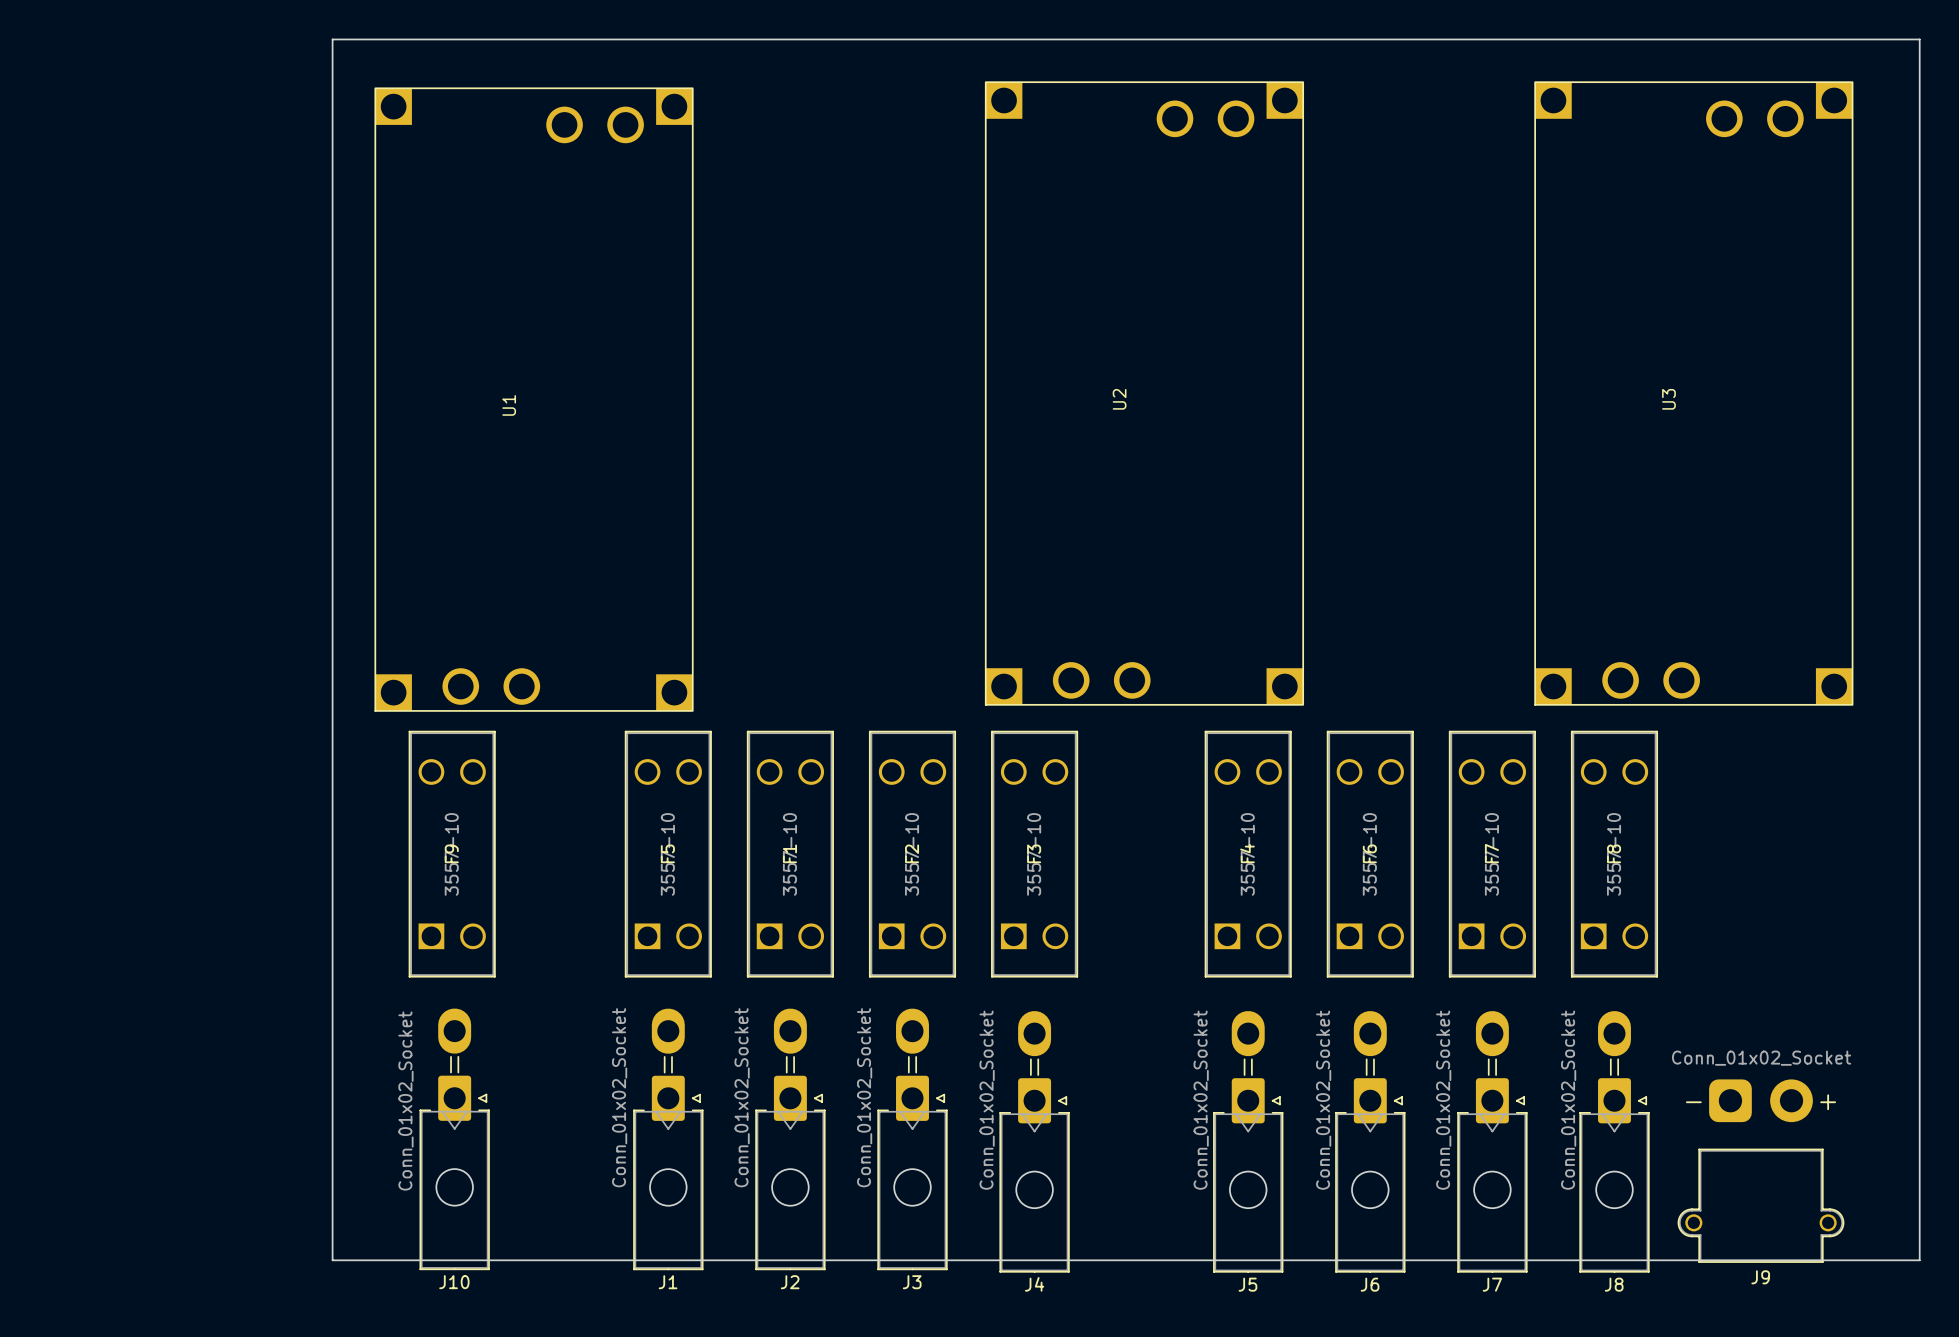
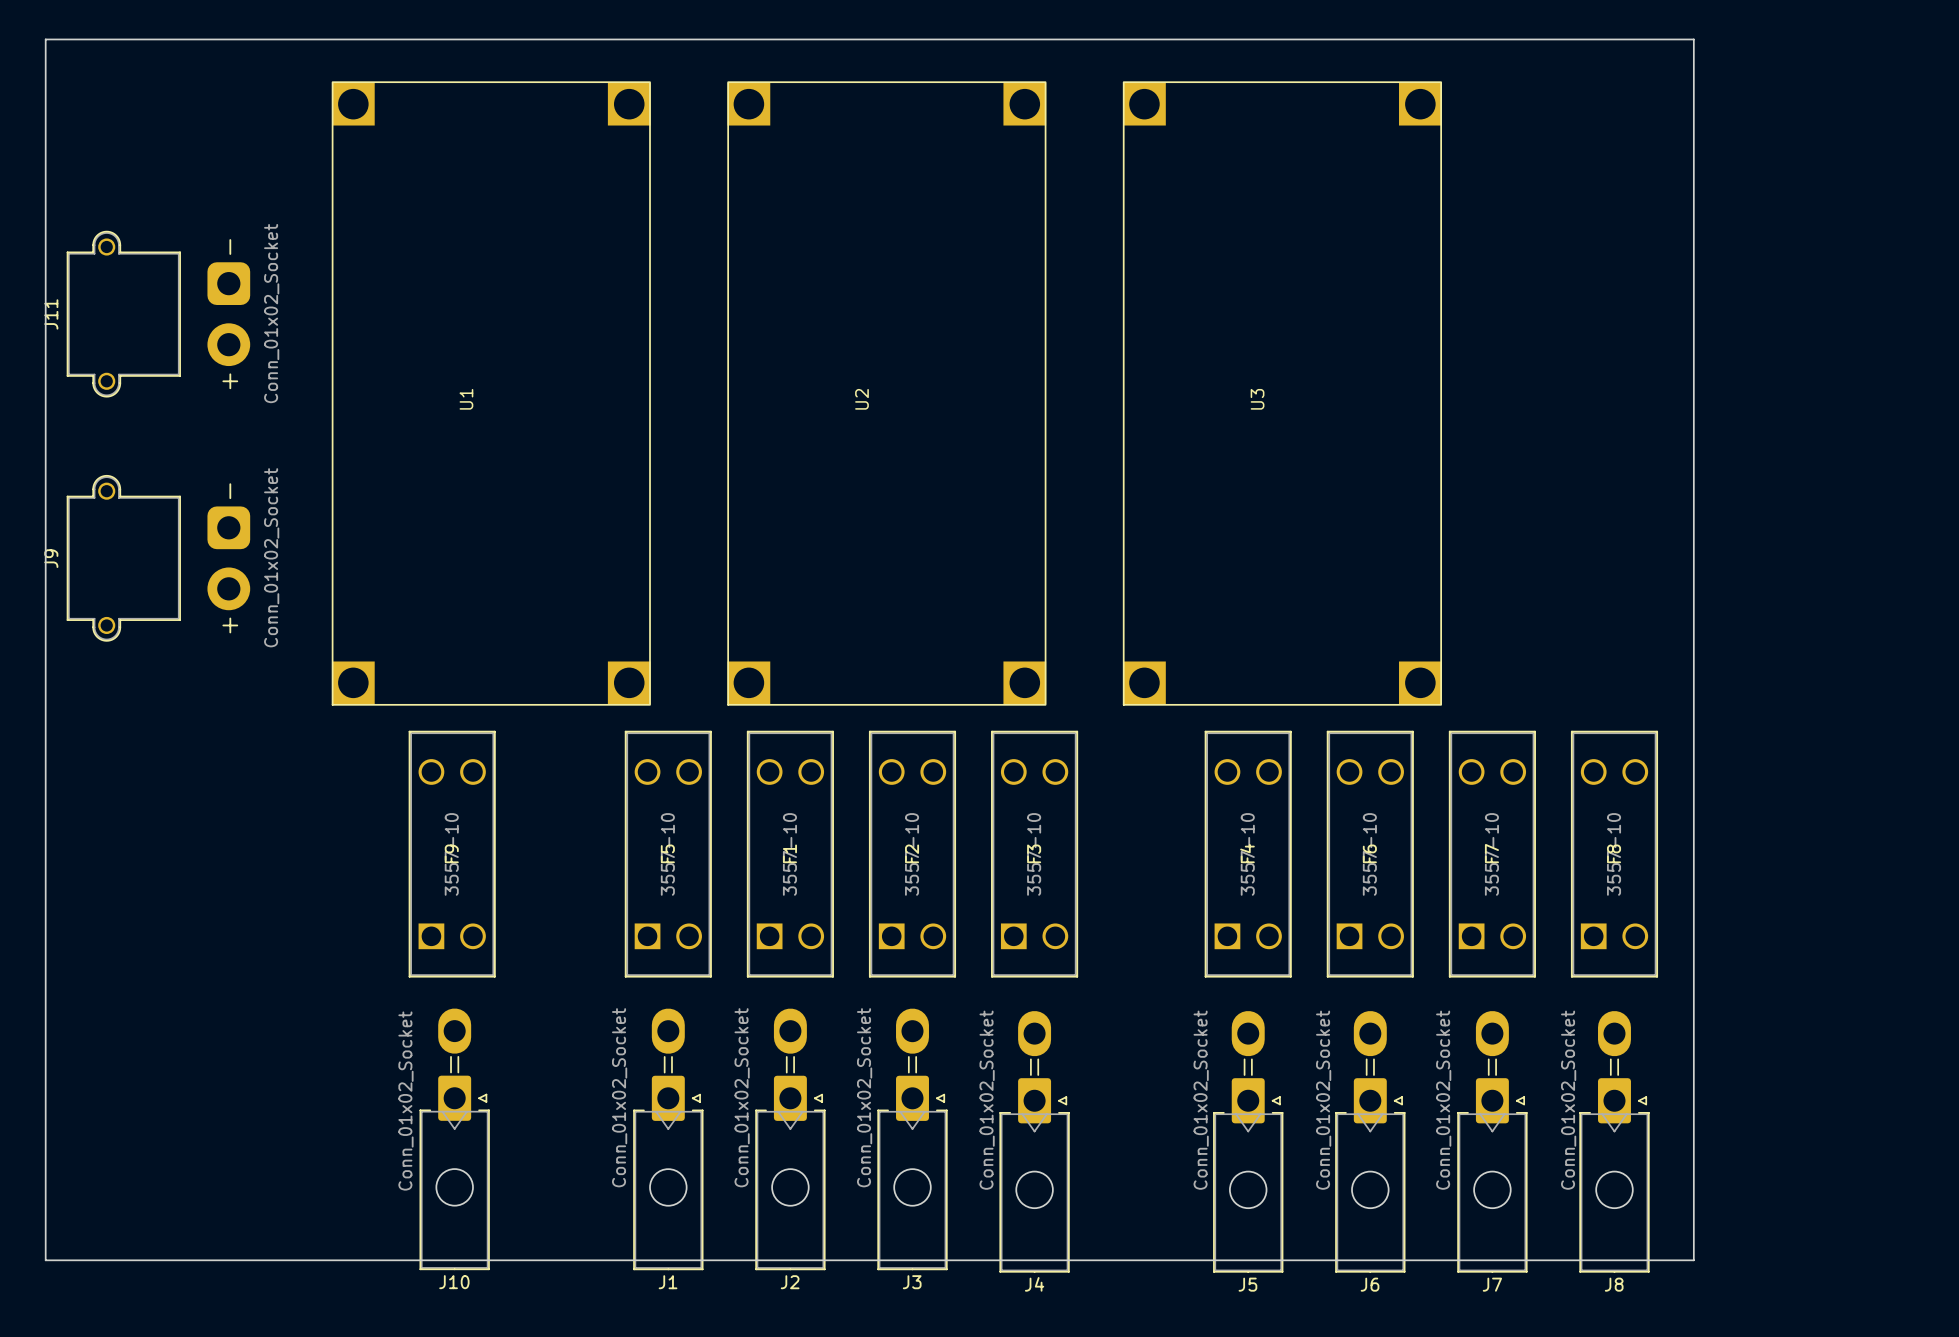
board edge: (332, 39) (332, 1260) -> (332, 39) (45, 39) (45, 1260) (332, 1260)
board edge: (1693, 39) (1919, 39) (1919, 1260) (1693, 1260) -> (1693, 39) (1693, 1260)
U2 footprint: [985, 81, 1304, 706] -> [727, 81, 1047, 706]
U3 footprint: [1534, 81, 1854, 706] -> [1123, 81, 1442, 706]
U1 footprint: [374, 87, 694, 712] -> [331, 81, 651, 706]
J11: none -> Conn_01x02_Socket (158, 314)
J9 rotation: 0° (1760, 1171) -> 90° clockwise (158, 558)
J9 position: (1760, 1171) -> (158, 558)

